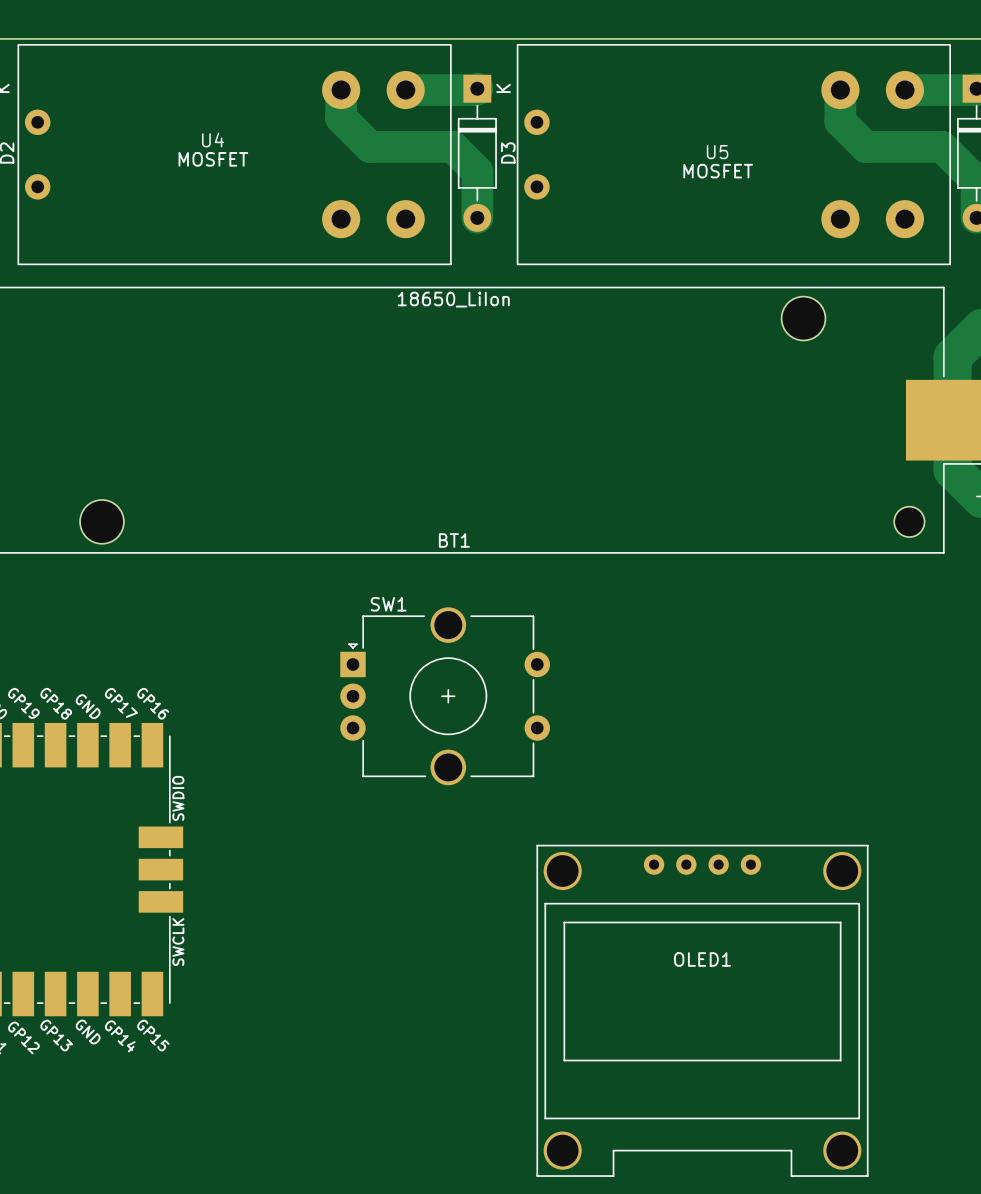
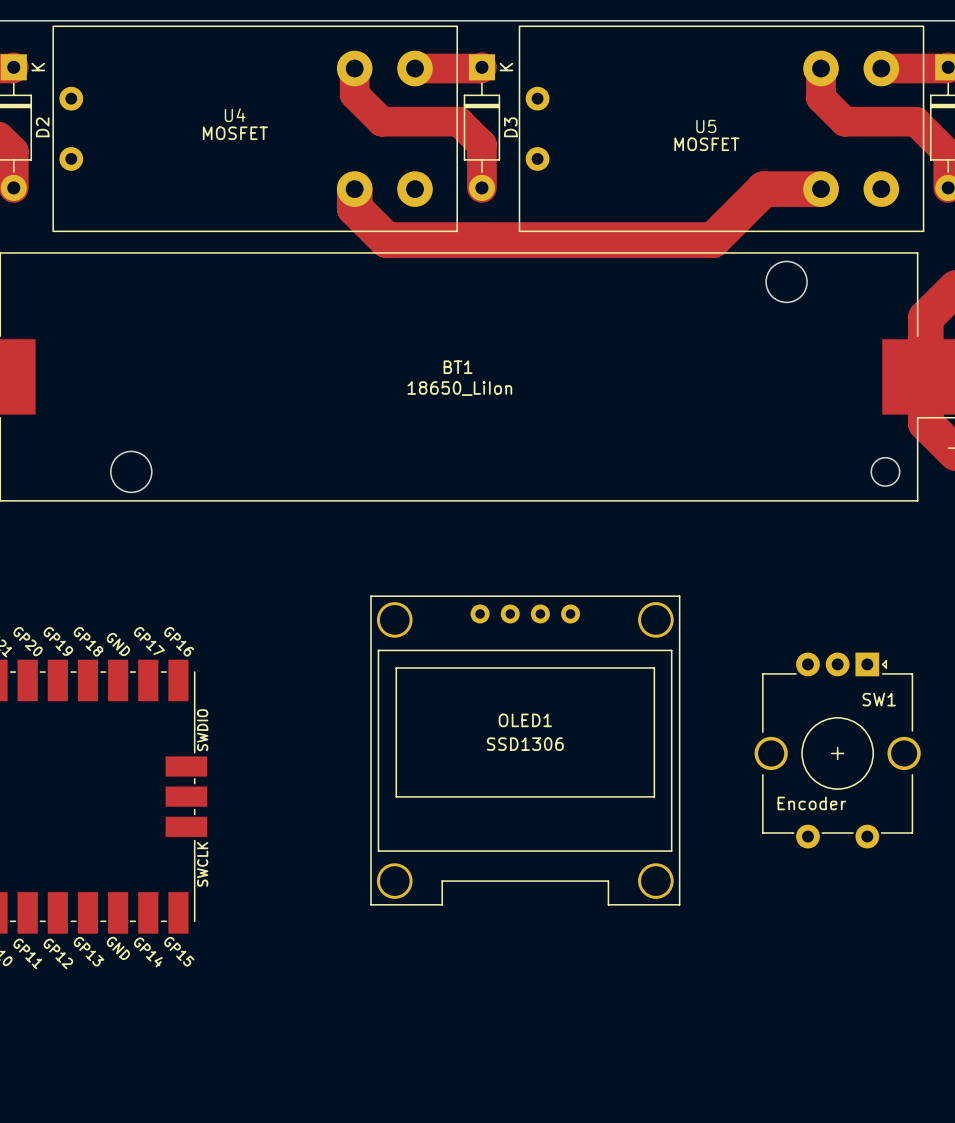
track: none -> (354, 189) (354, 208) (386, 240) (712, 240) (763, 189) (821, 189)
BT1 value position: 18650_LiIon (453, 299) -> 18650_LiIon (459, 388)
BT1 name position: BT1 (454, 540) -> BT1 (458, 367)
SW1 name position: SW1 (388, 604) -> SW1 (879, 699)
SW1 rotation: 0° (445, 696) -> 90° clockwise (837, 750)
SW1 position: (445, 696) -> (837, 750)
OLED1 value: none -> SSD1306 (525, 744)
SW1 value: none -> Encoder (811, 803)
OLED1 name position: OLED1 (702, 959) -> OLED1 (525, 720)
OLED1 position: (702, 1010) -> (525, 750)

